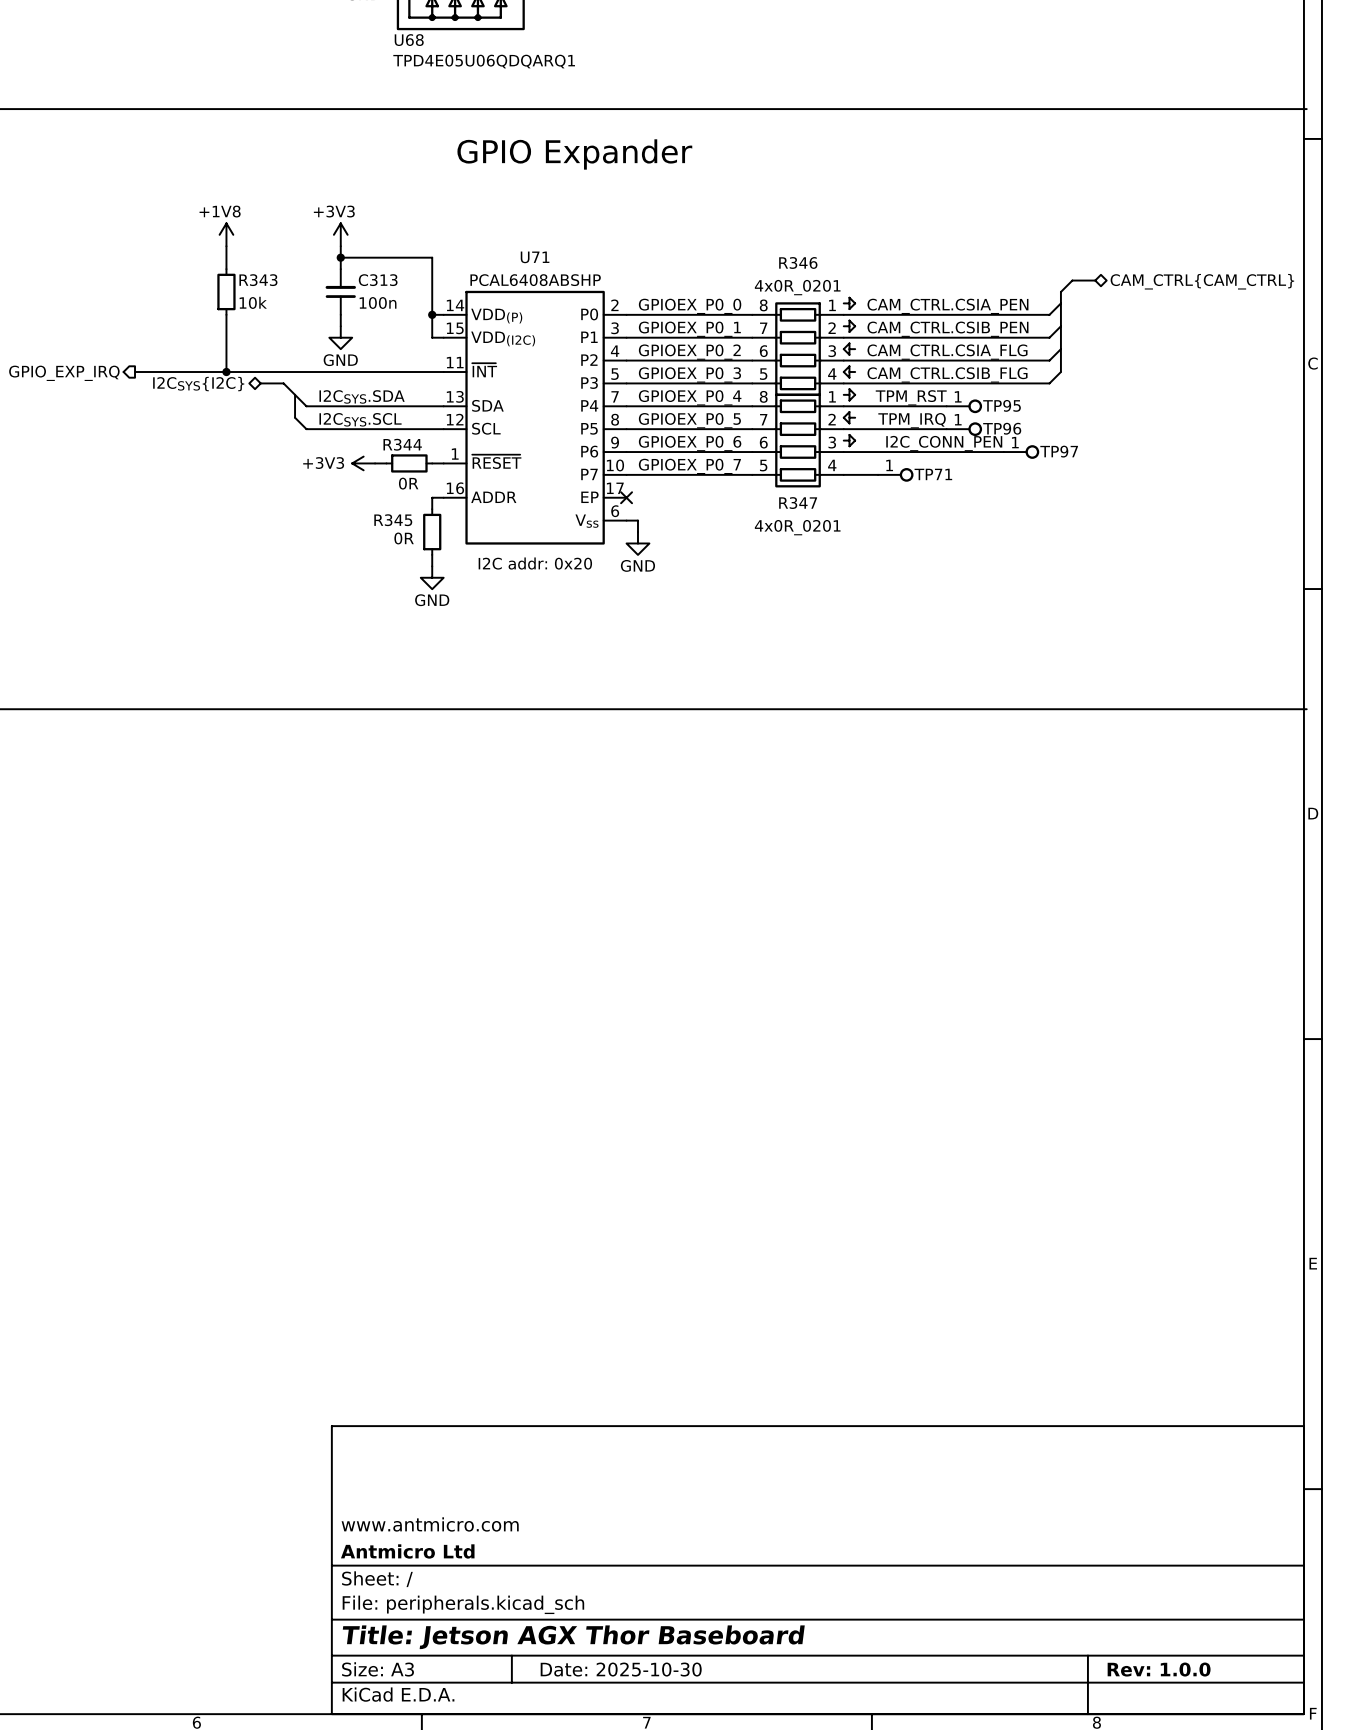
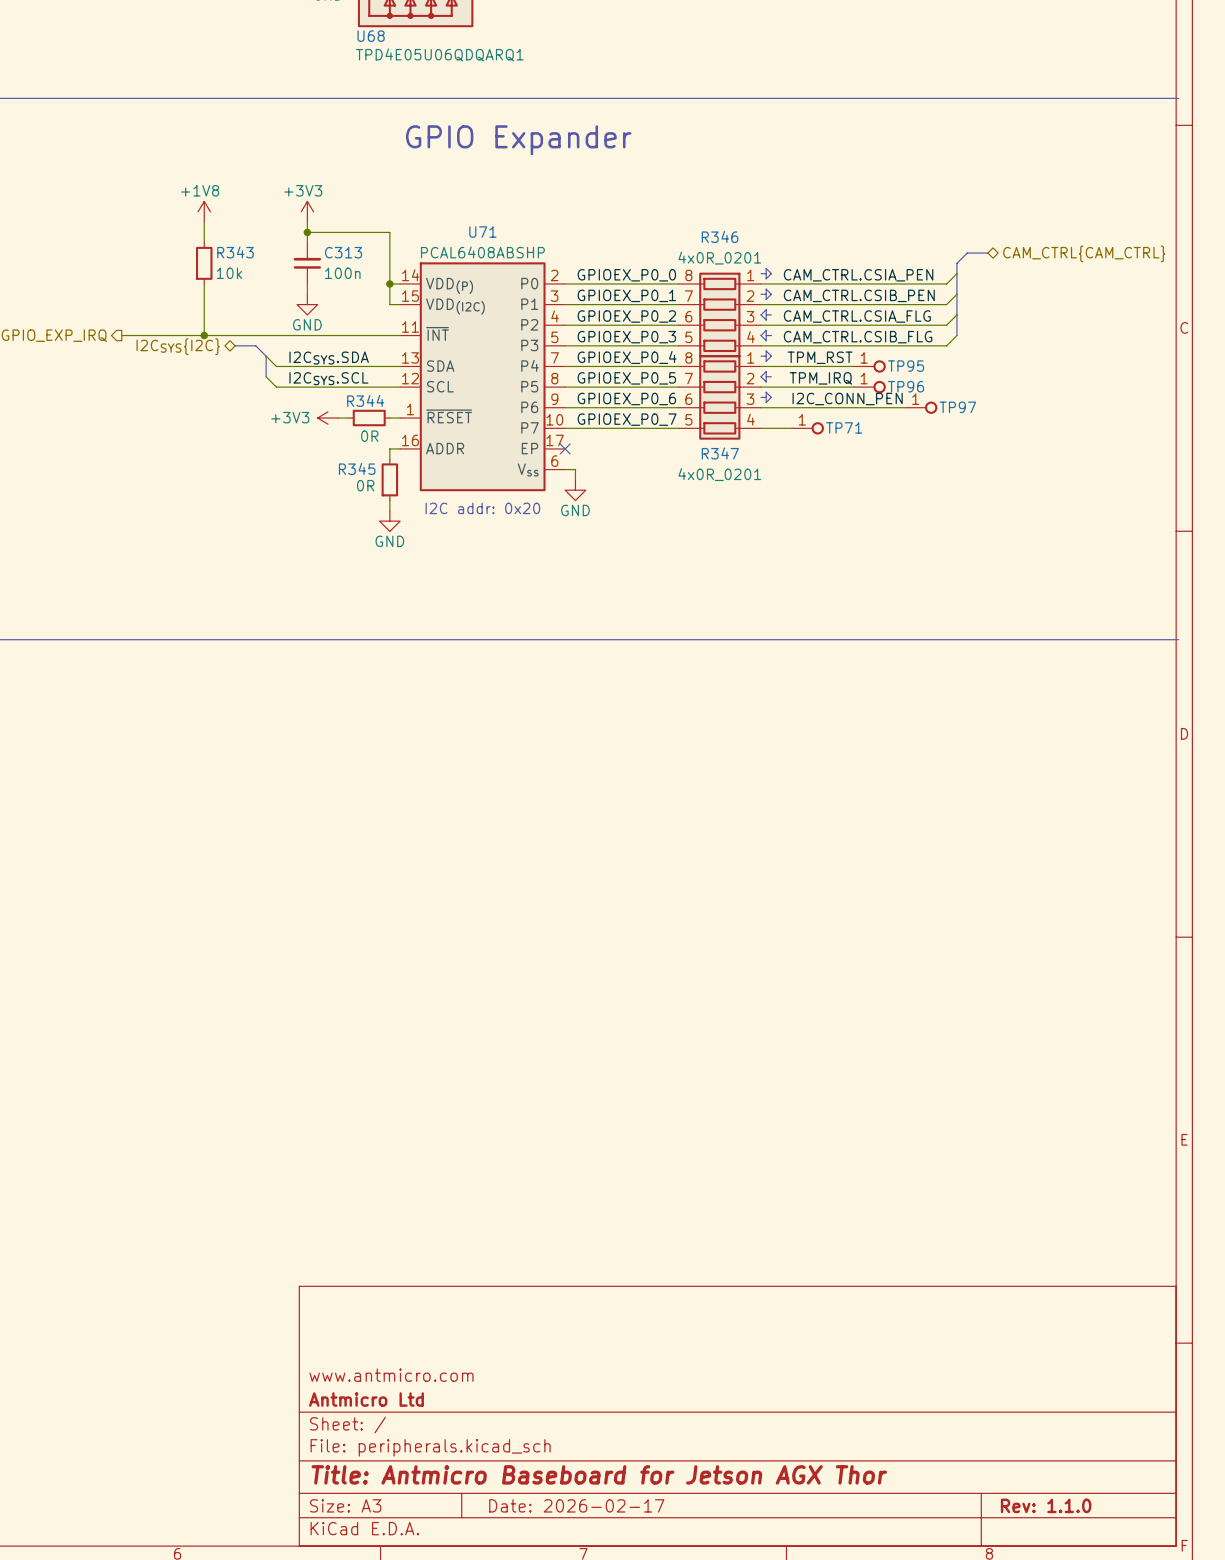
title block: Title: Jetson AGX Thor Baseboard (573, 1637) -> Title: Antmicro Baseboard for Jetson AGX Thor (599, 1474)
title block: Date: 2025-10-30 (621, 1669) -> Date: 2026-02-17 (576, 1505)
title block: Rev: 1.0.0 (1159, 1669) -> Rev: 1.1.0 (1046, 1505)

